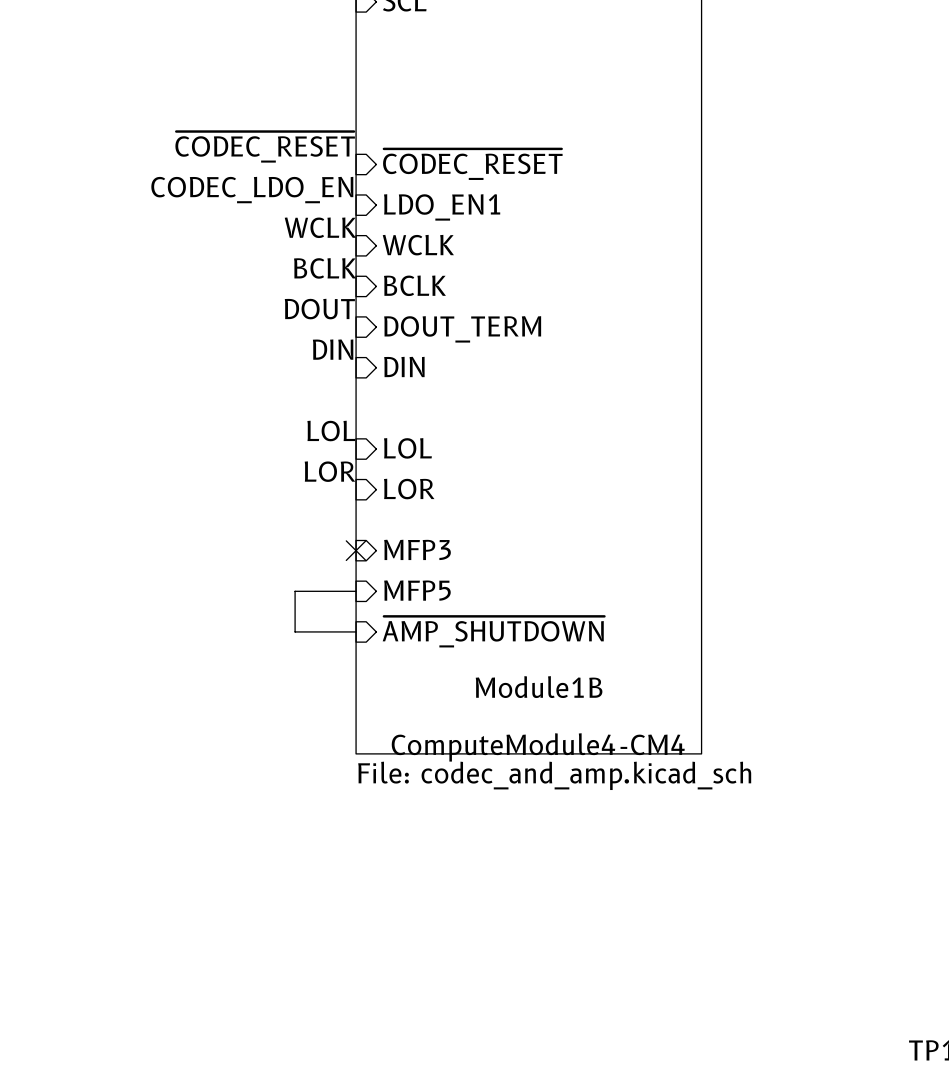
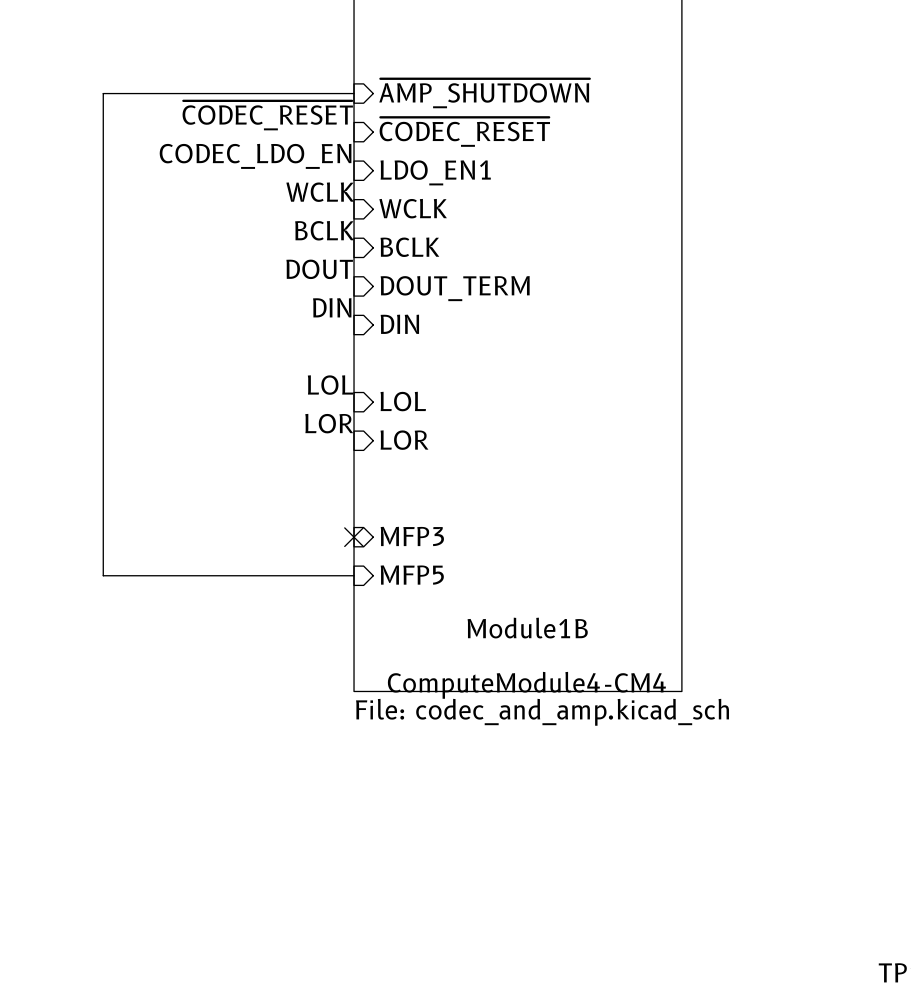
sheet pin: none -> ~{AMP_SHUTDOWN} (484, 93)
sheet pin: MFP3 (417, 549) -> none
no-connect mark position: (356, 550) -> (354, 537)
sheet pin: MFP5 (417, 590) -> MFP3 (412, 536)
wire: (356, 591) (295, 591) (295, 631) -> (354, 93) (103, 93) (103, 575) (296, 575)
sheet pin: ~{AMP_SHUTDOWN} (493, 631) -> MFP5 (412, 575)

